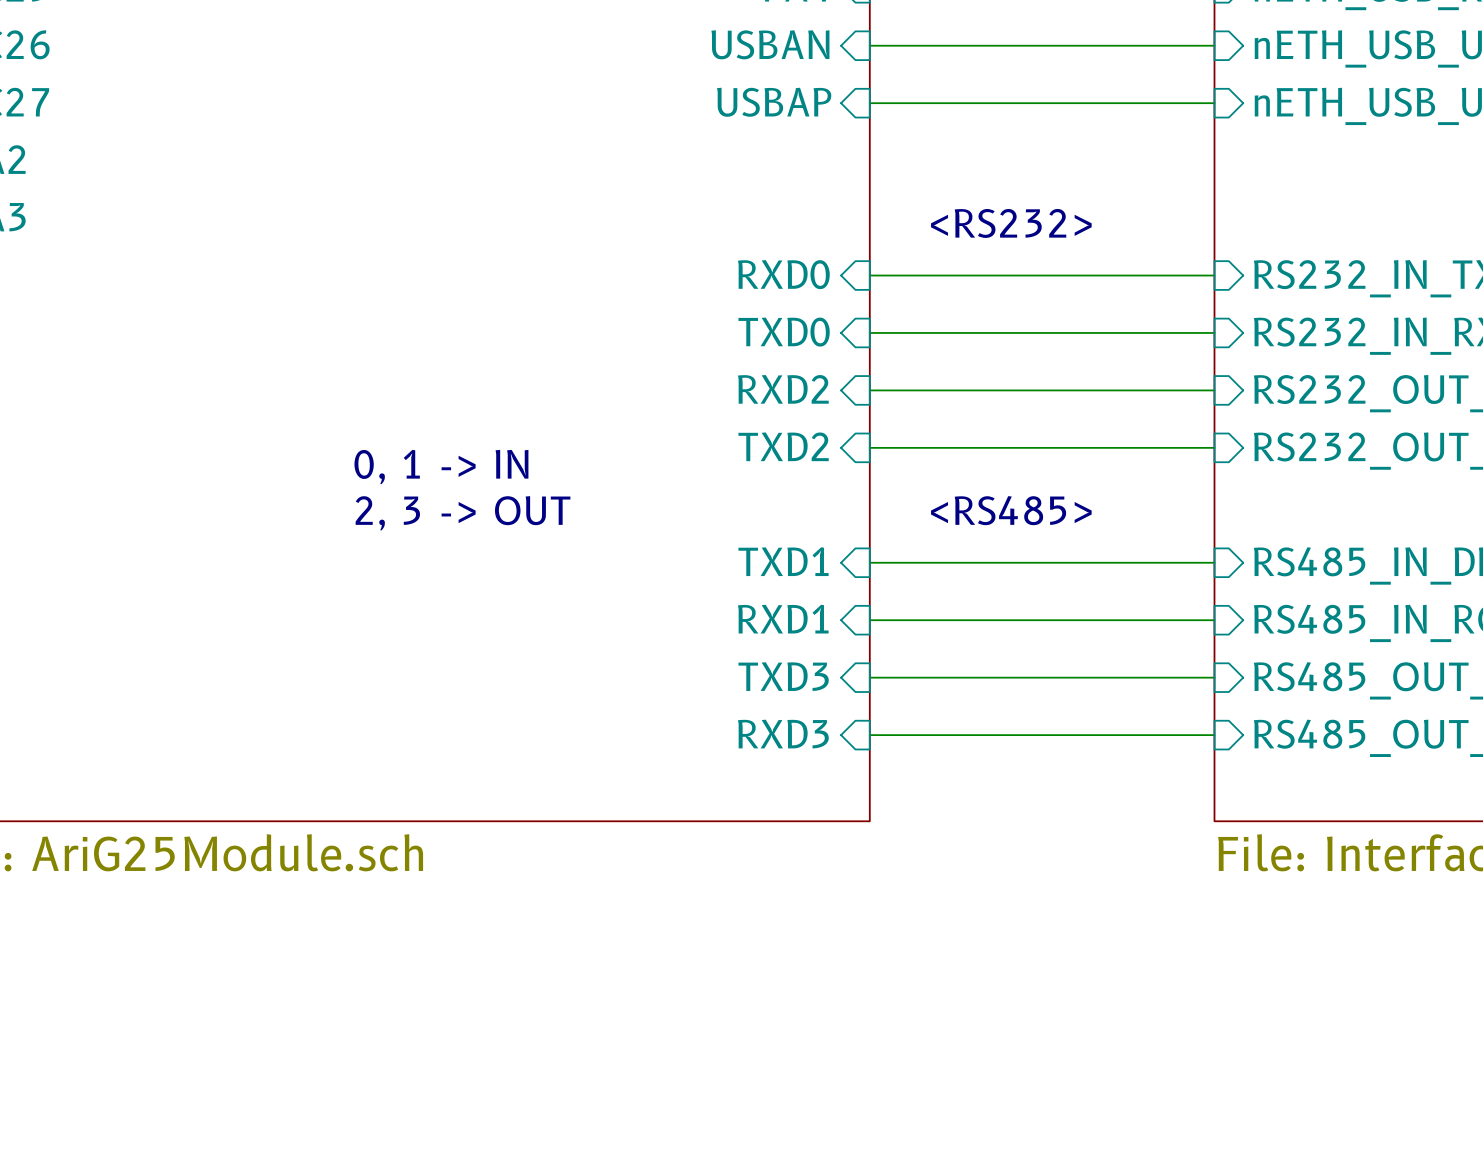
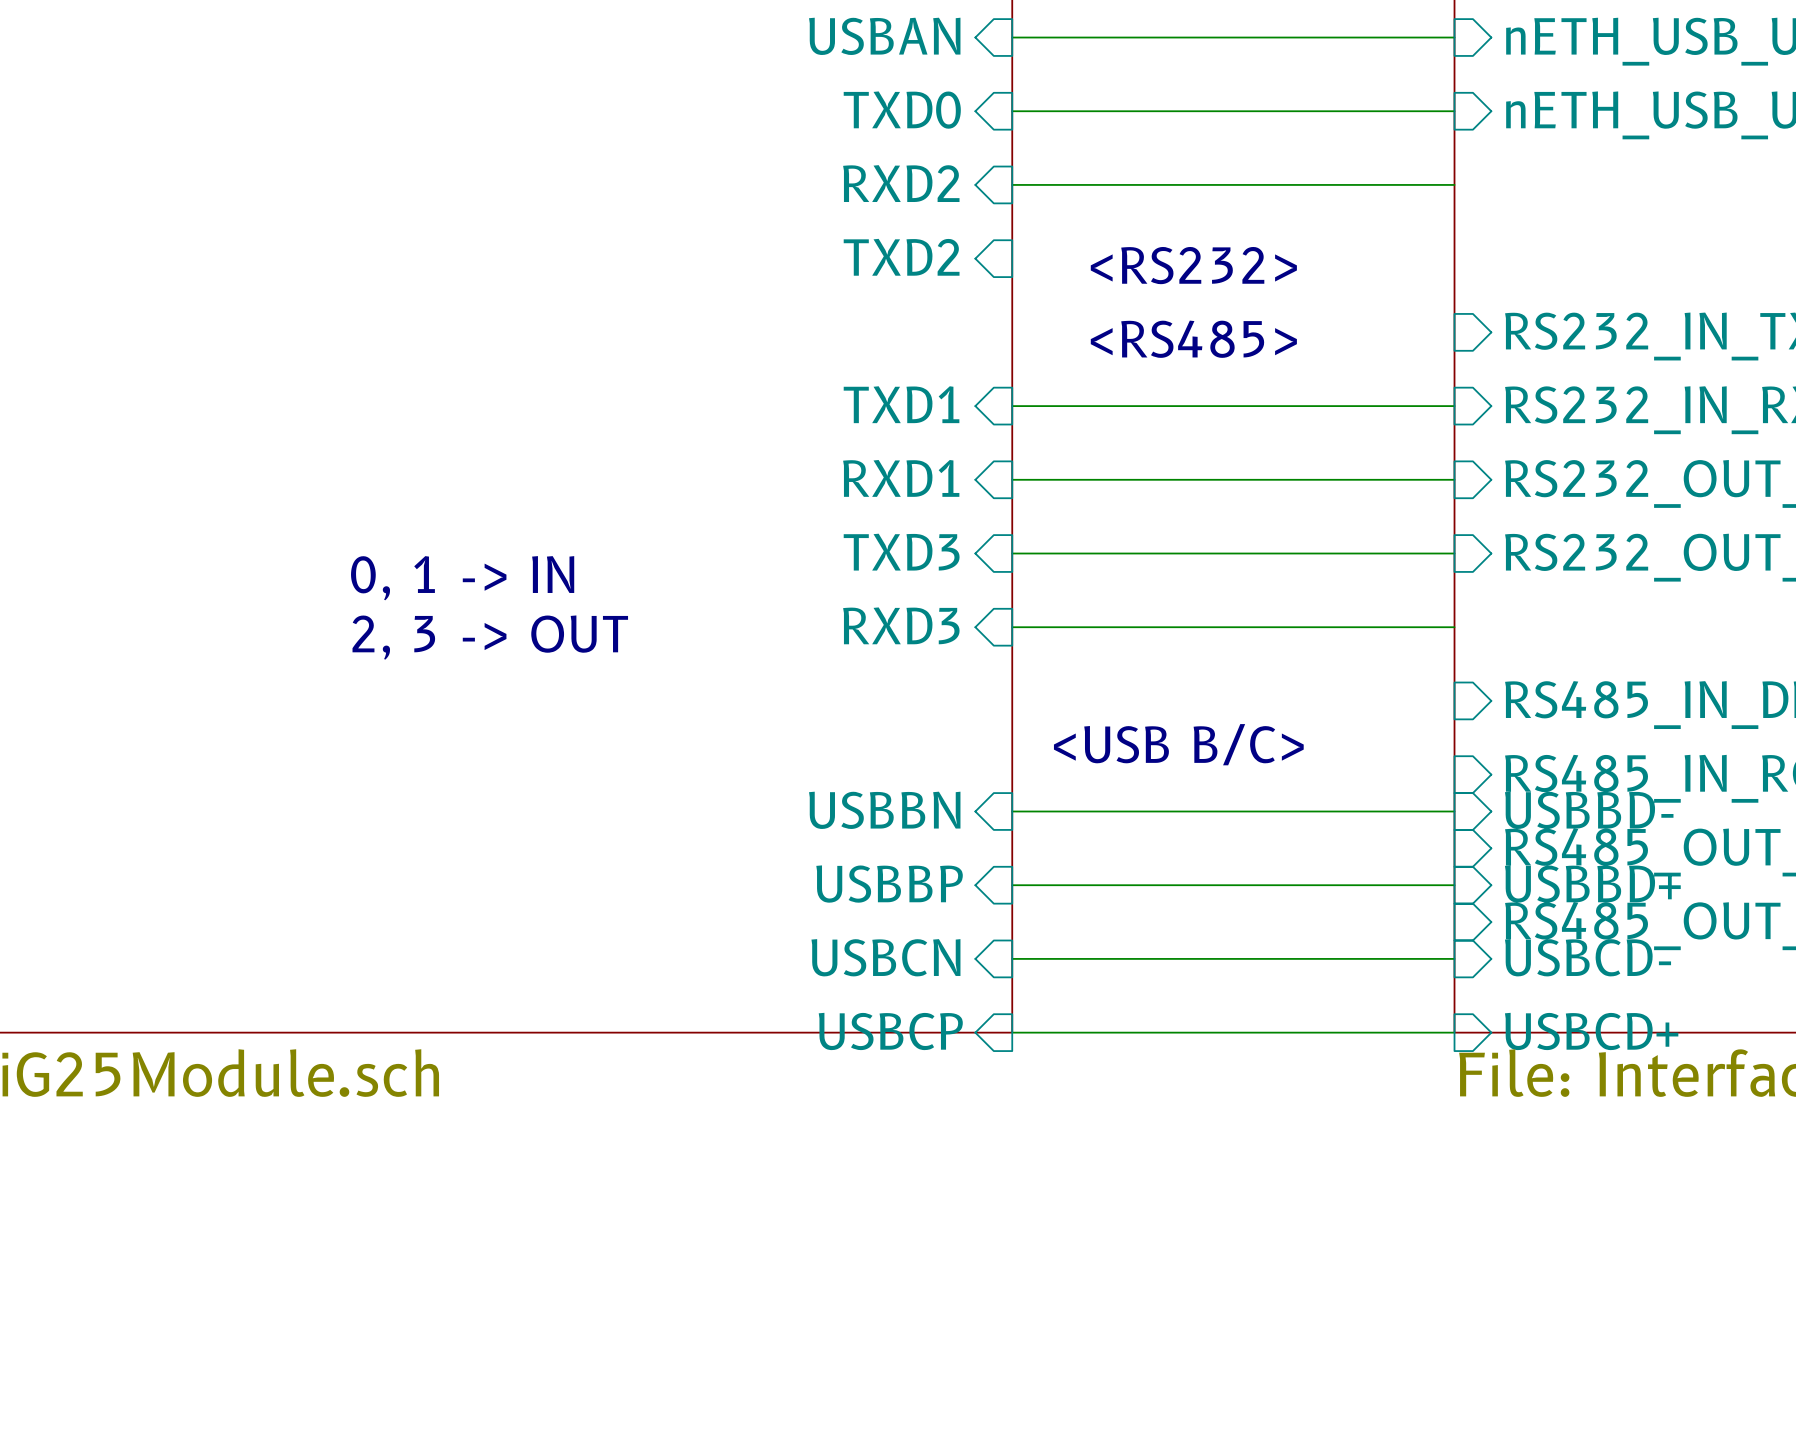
sheet pin: USBAP (774, 102) -> TXD0 (902, 110)
sheet pin: none -> RXD2 (901, 183)
wire: none -> (1012, 184) (1454, 184)
sheet pin: none -> TXD2 (901, 257)
sheet pin: RXD0 (783, 274) -> none
wire: (869, 275) (1214, 275) -> (1012, 627) (1454, 627)
sheet pin: TXD0 (784, 332) -> TXD1 (901, 404)
sheet pin: RXD2 (783, 389) -> RXD1 (901, 478)
sheet pin: TXD2 (783, 446) -> TXD3 (901, 552)
text position: <RS485> (1011, 510) -> <RS485> (1193, 339)
sheet pin: TXD1 (783, 561) -> none
wire: (869, 562) (1214, 562) -> (1012, 811) (1454, 811)
text: none -> <USB B/C> (1178, 744)
sheet pin: RXD1 (783, 619) -> none
wire: (869, 620) (1214, 620) -> (1012, 885) (1454, 885)
sheet pin: none -> USBBN (884, 810)
sheet pin: none -> USBBD- (1589, 810)
sheet pin: TXD3 (783, 676) -> none
wire: (869, 677) (1214, 677) -> (1012, 958) (1454, 958)
sheet pin: none -> USBBP (889, 884)
sheet pin: none -> USBBD+ (1592, 884)
sheet pin position: RXD3 (783, 734) -> RXD3 (901, 625)
wire: (869, 735) (1214, 735) -> (1012, 1032) (1454, 1032)
sheet pin: none -> USBCN (885, 957)
sheet pin: none -> USBCD- (1588, 957)
sheet pin: none -> USBCP (890, 1031)
sheet pin: none -> USBCD+ (1591, 1031)

